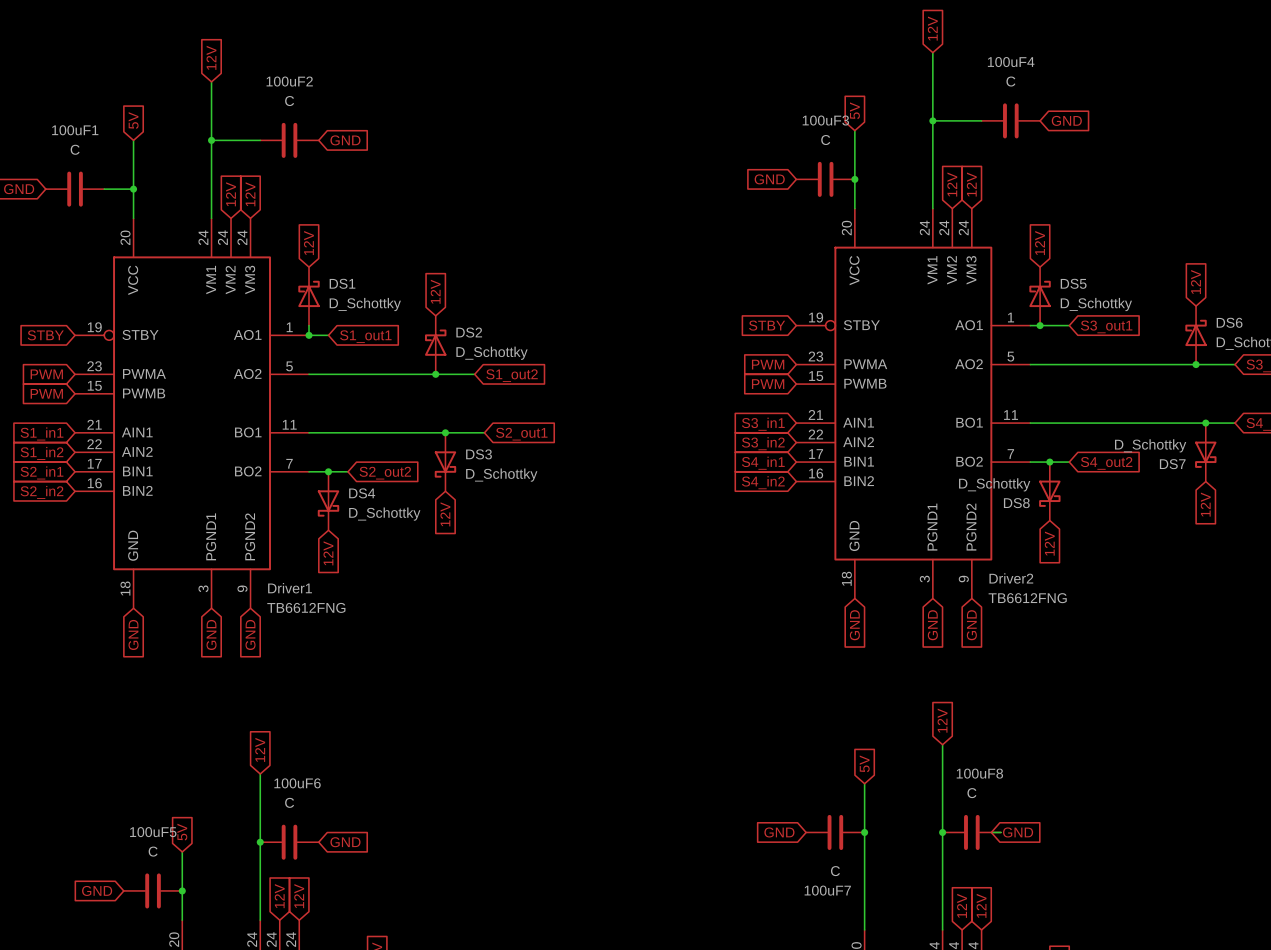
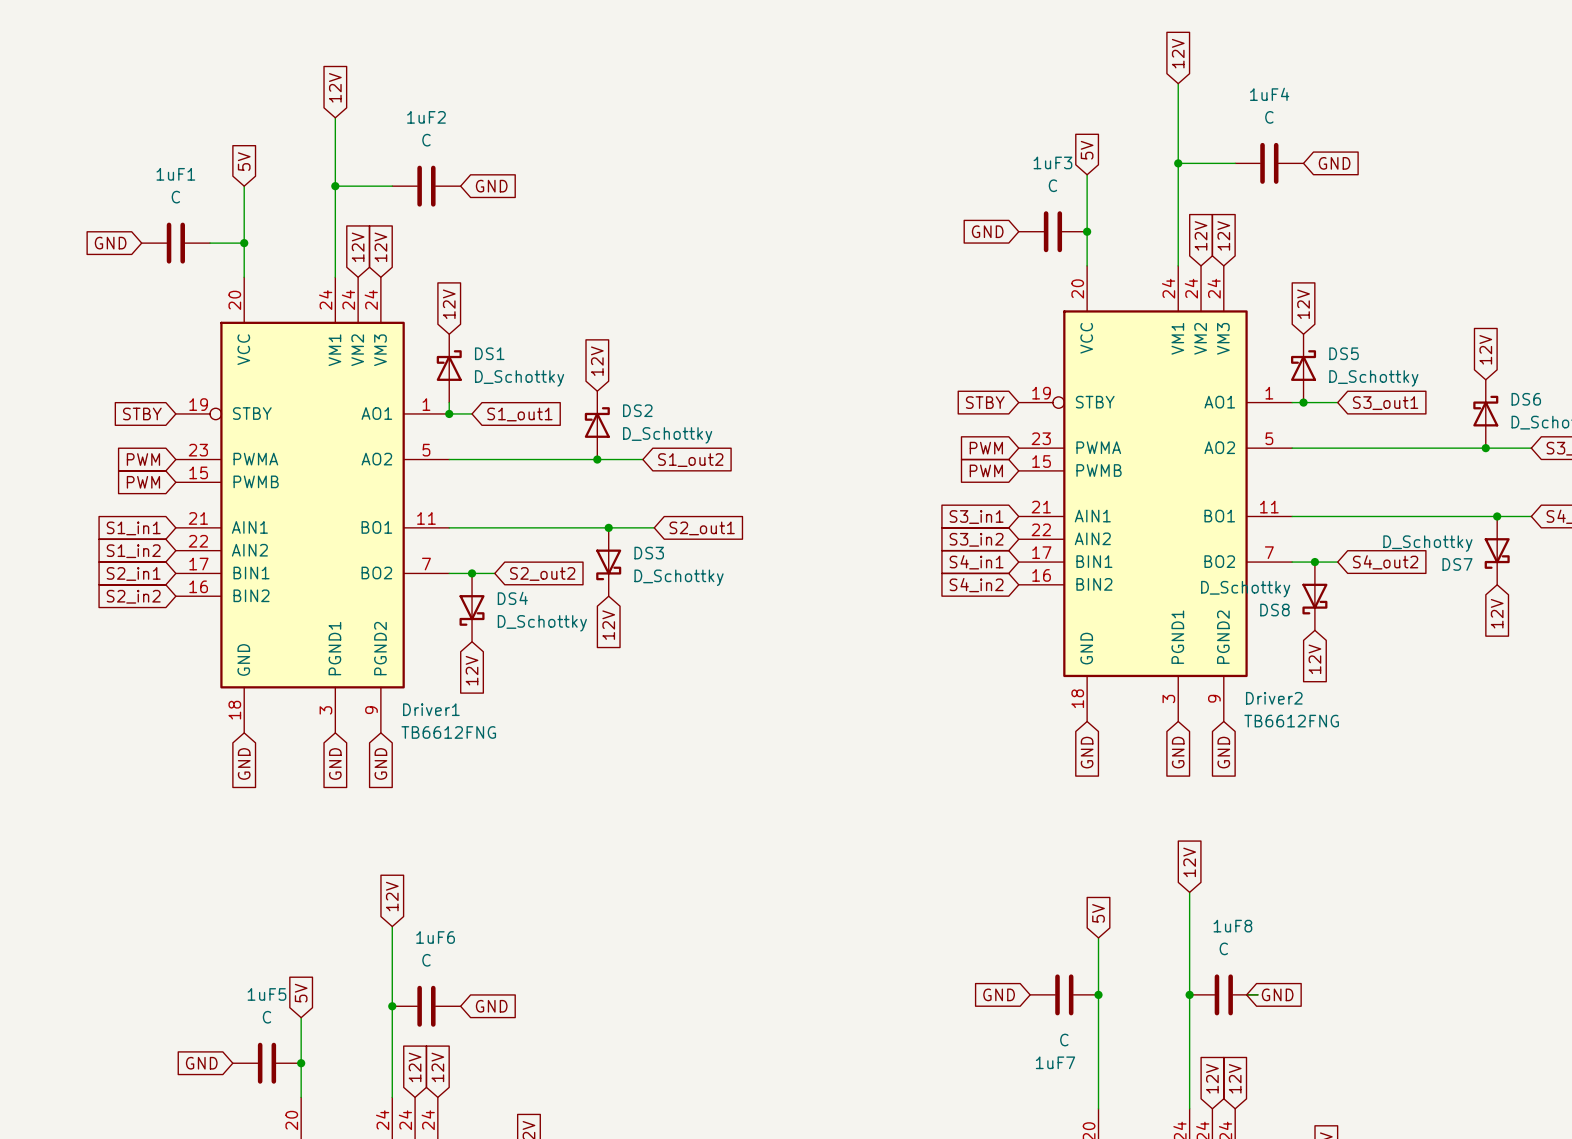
100uF4 name: 100uF4 (1011, 62) -> 1uF4 (1269, 94)
100uF2 name: 100uF2 (289, 81) -> 1uF2 (426, 117)
100uF3 name: 100uF3 (825, 120) -> 1uF3 (1052, 162)
100uF1 name: 100uF1 (75, 130) -> 1uF1 (175, 174)
100uF8 name: 100uF8 (979, 773) -> 1uF8 (1232, 926)
100uF6 name: 100uF6 (297, 783) -> 1uF6 (435, 937)
100uF5 name: 100uF5 (153, 832) -> 1uF5 (266, 994)
100uF7 name: 100uF7 (827, 890) -> 1uF7 (1055, 1062)

